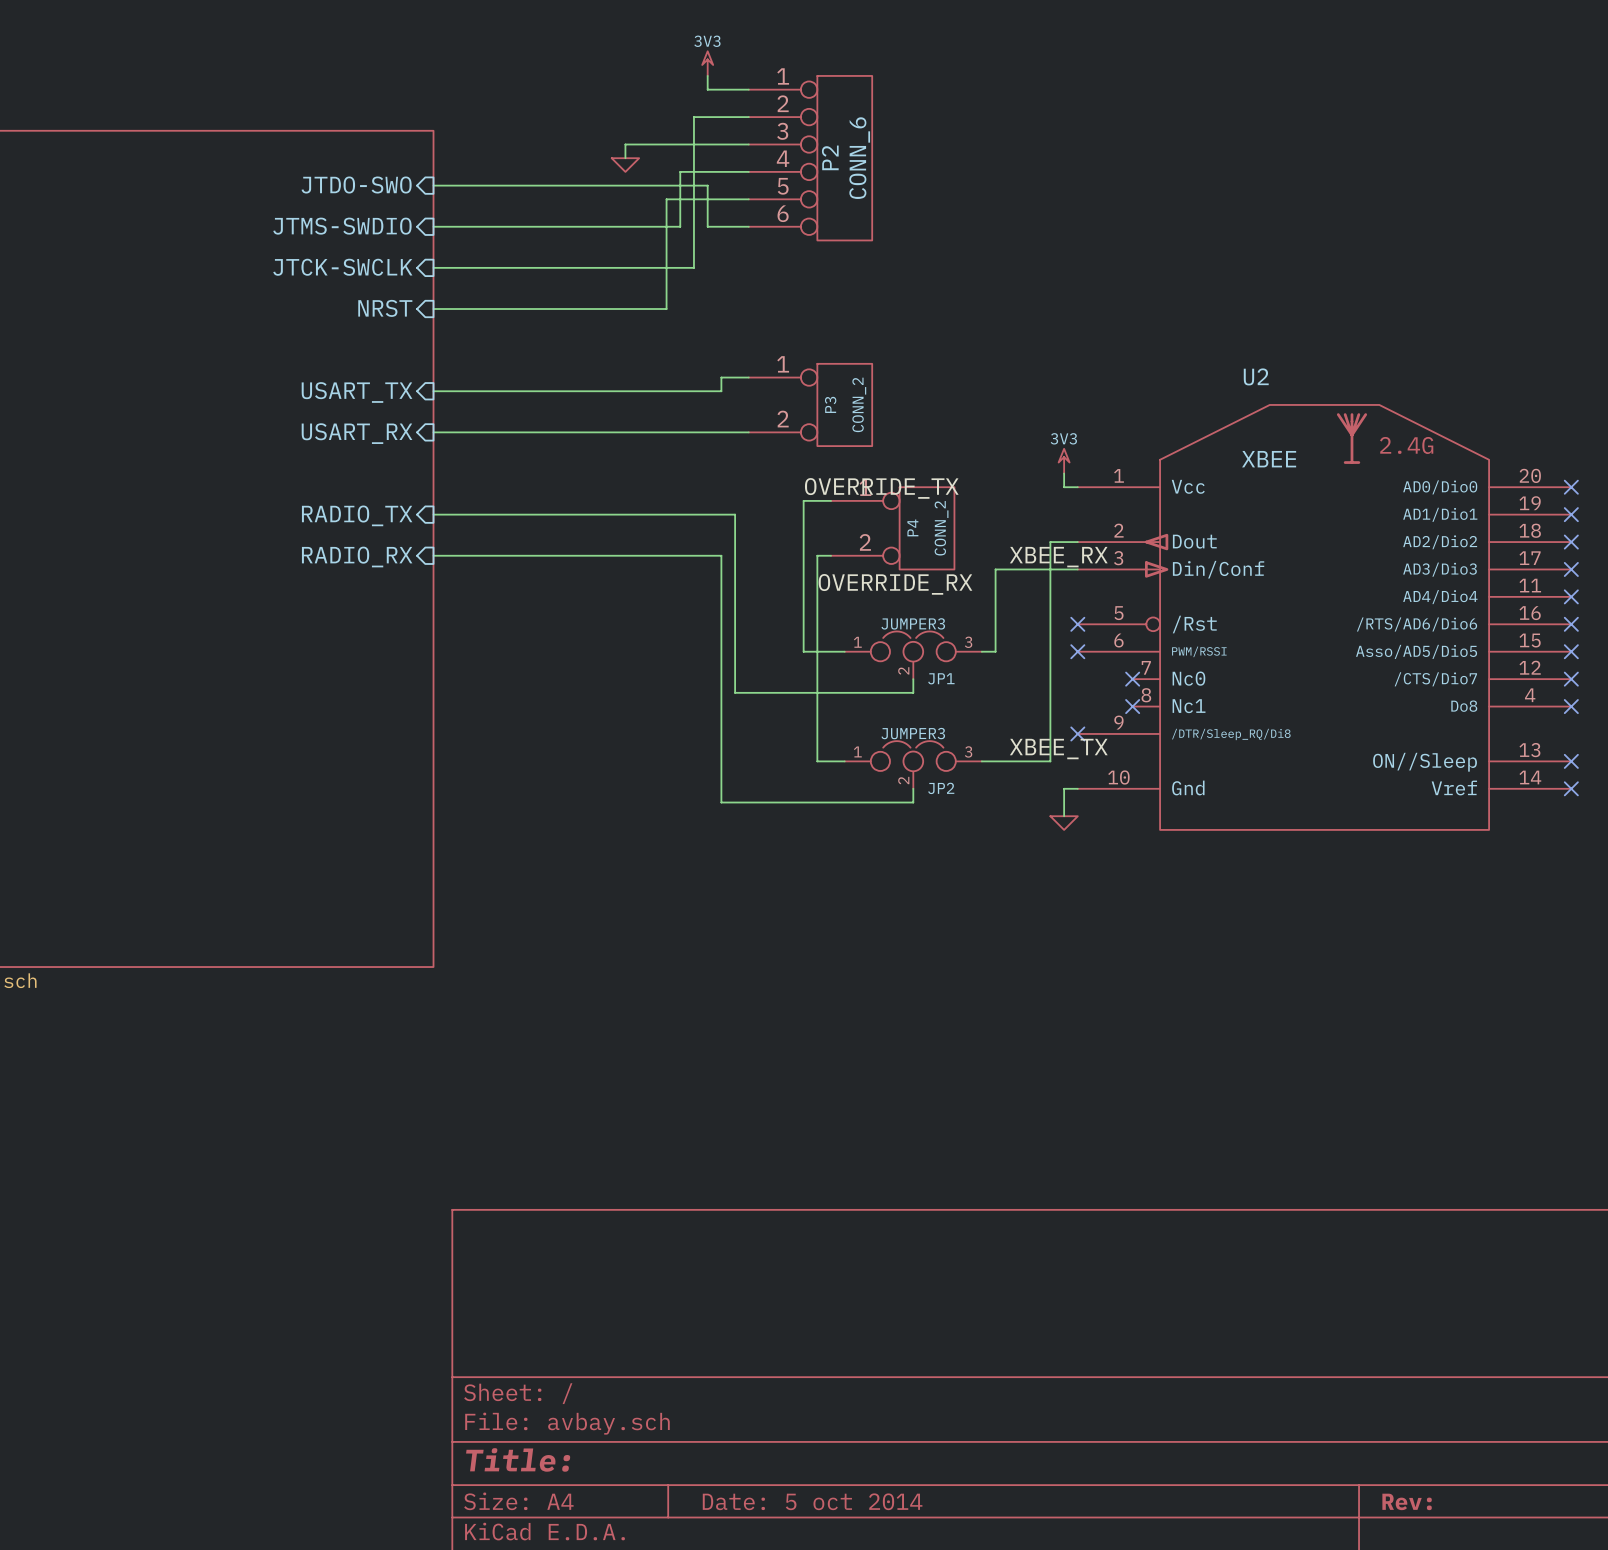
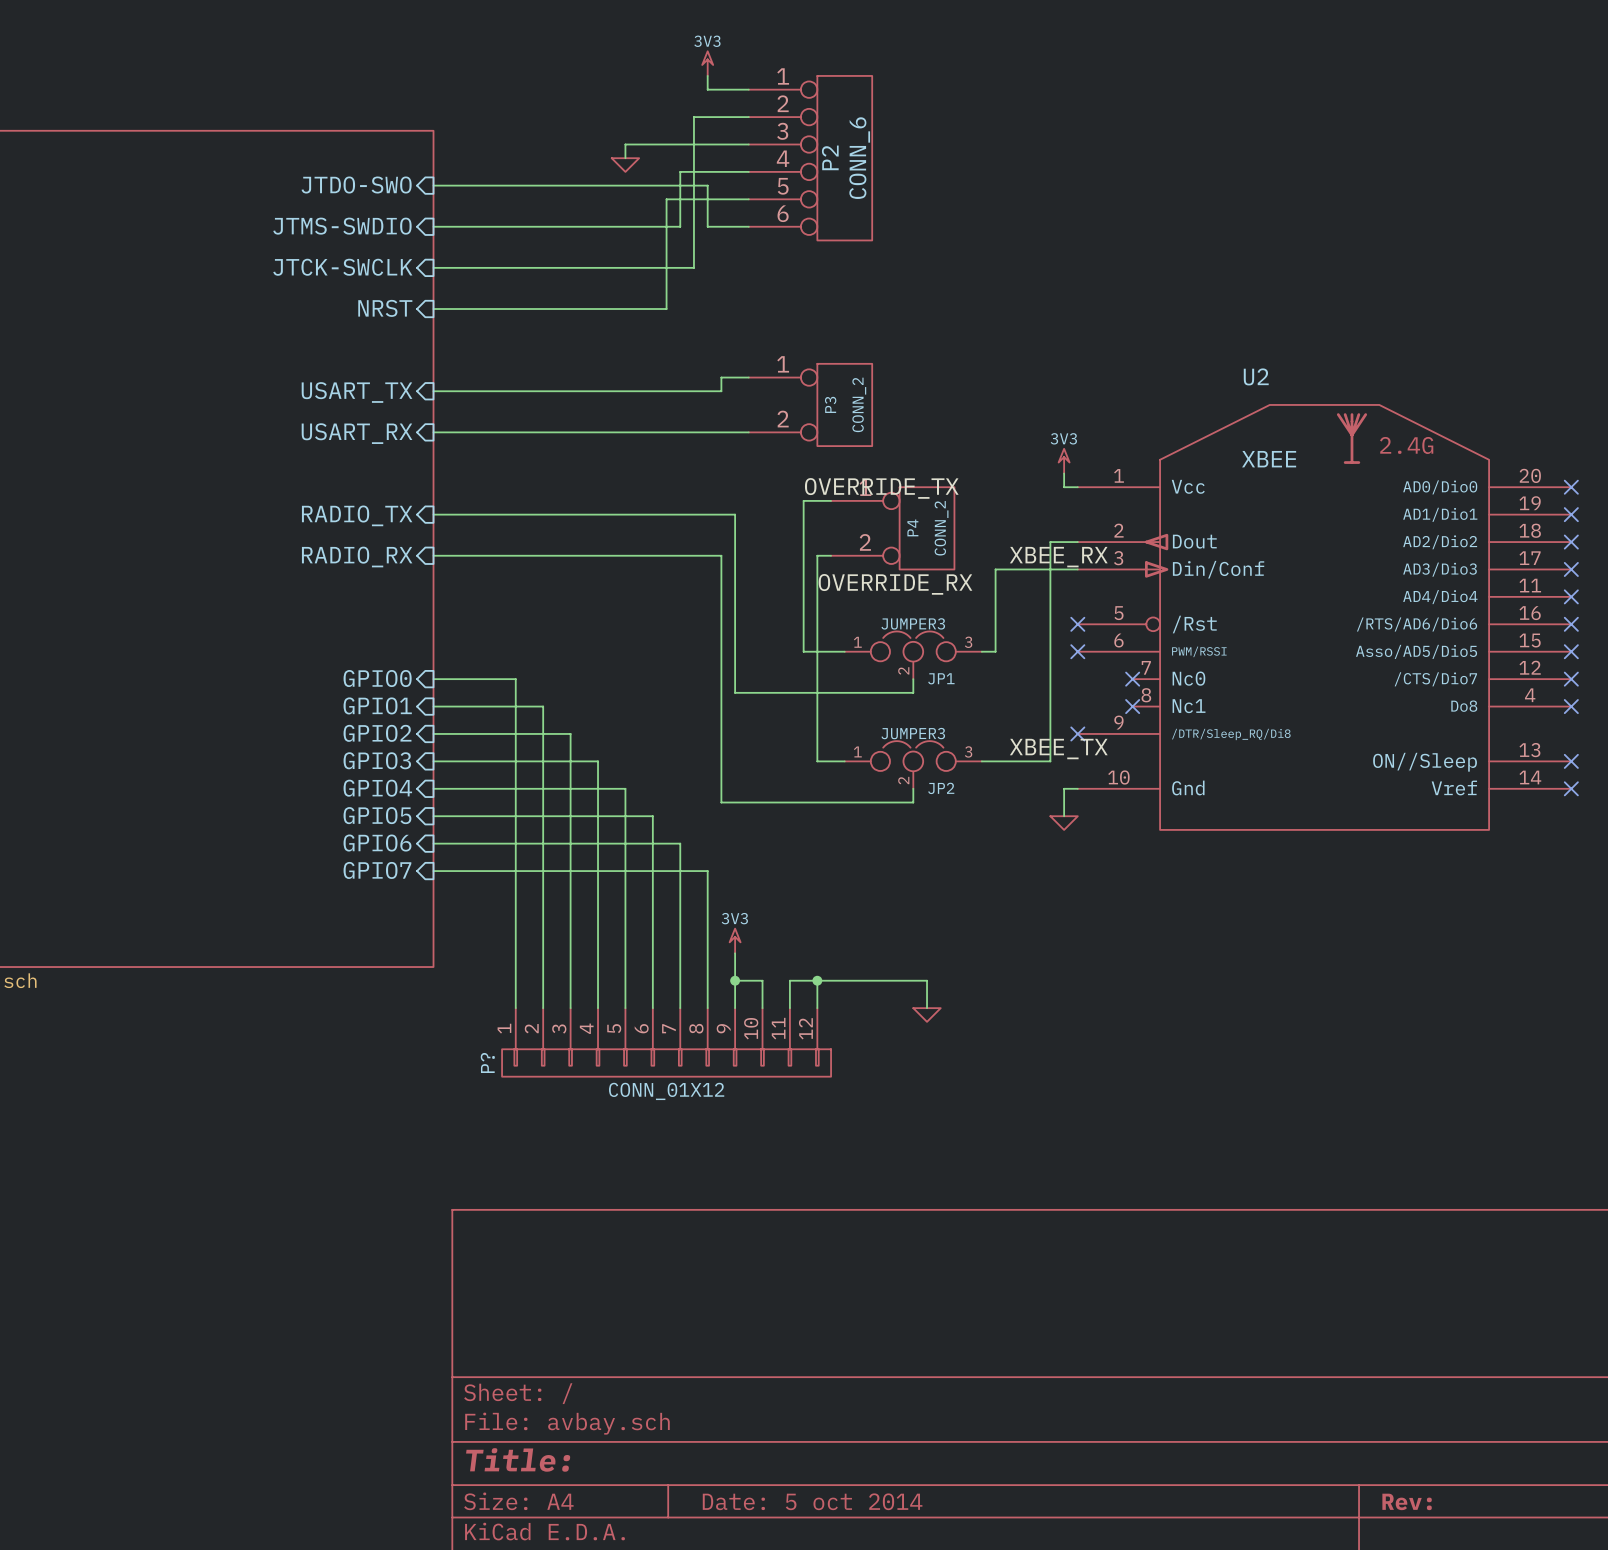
sheet pin: none -> GPIO0 (377, 678)
wire: none -> (433, 679) (515, 679) (515, 1008)
sheet pin: none -> GPIO1 (377, 705)
wire: none -> (433, 706) (543, 706) (543, 1008)
sheet pin: none -> GPIO2 (377, 733)
wire: none -> (433, 733) (570, 733) (570, 1008)
sheet pin: none -> GPIO3 (377, 760)
wire: none -> (433, 761) (598, 761) (598, 1008)
sheet pin: none -> GPIO4 (377, 788)
wire: none -> (433, 788) (625, 788) (625, 1008)
sheet pin: none -> GPIO5 (377, 815)
wire: none -> (433, 816) (652, 816) (652, 1008)
sheet pin: none -> GPIO6 (377, 843)
wire: none -> (433, 843) (680, 843) (680, 1008)
sheet pin: none -> GPIO7 (377, 870)
wire: none -> (433, 871) (707, 871) (707, 1008)
power symbol: none -> 3V3 (735, 940)
wire: none -> (735, 953) (735, 1008)
wire: none -> (735, 980) (762, 980) (762, 1008)
junction: none -> (735, 980)
wire: none -> (817, 980) (817, 1008)
junction: none -> (817, 980)
wire: none -> (789, 1008) (789, 980) (927, 980) (927, 1008)
power symbol: none -> (927, 1015)
P?: none -> CONN_01X12 (666, 1042)

